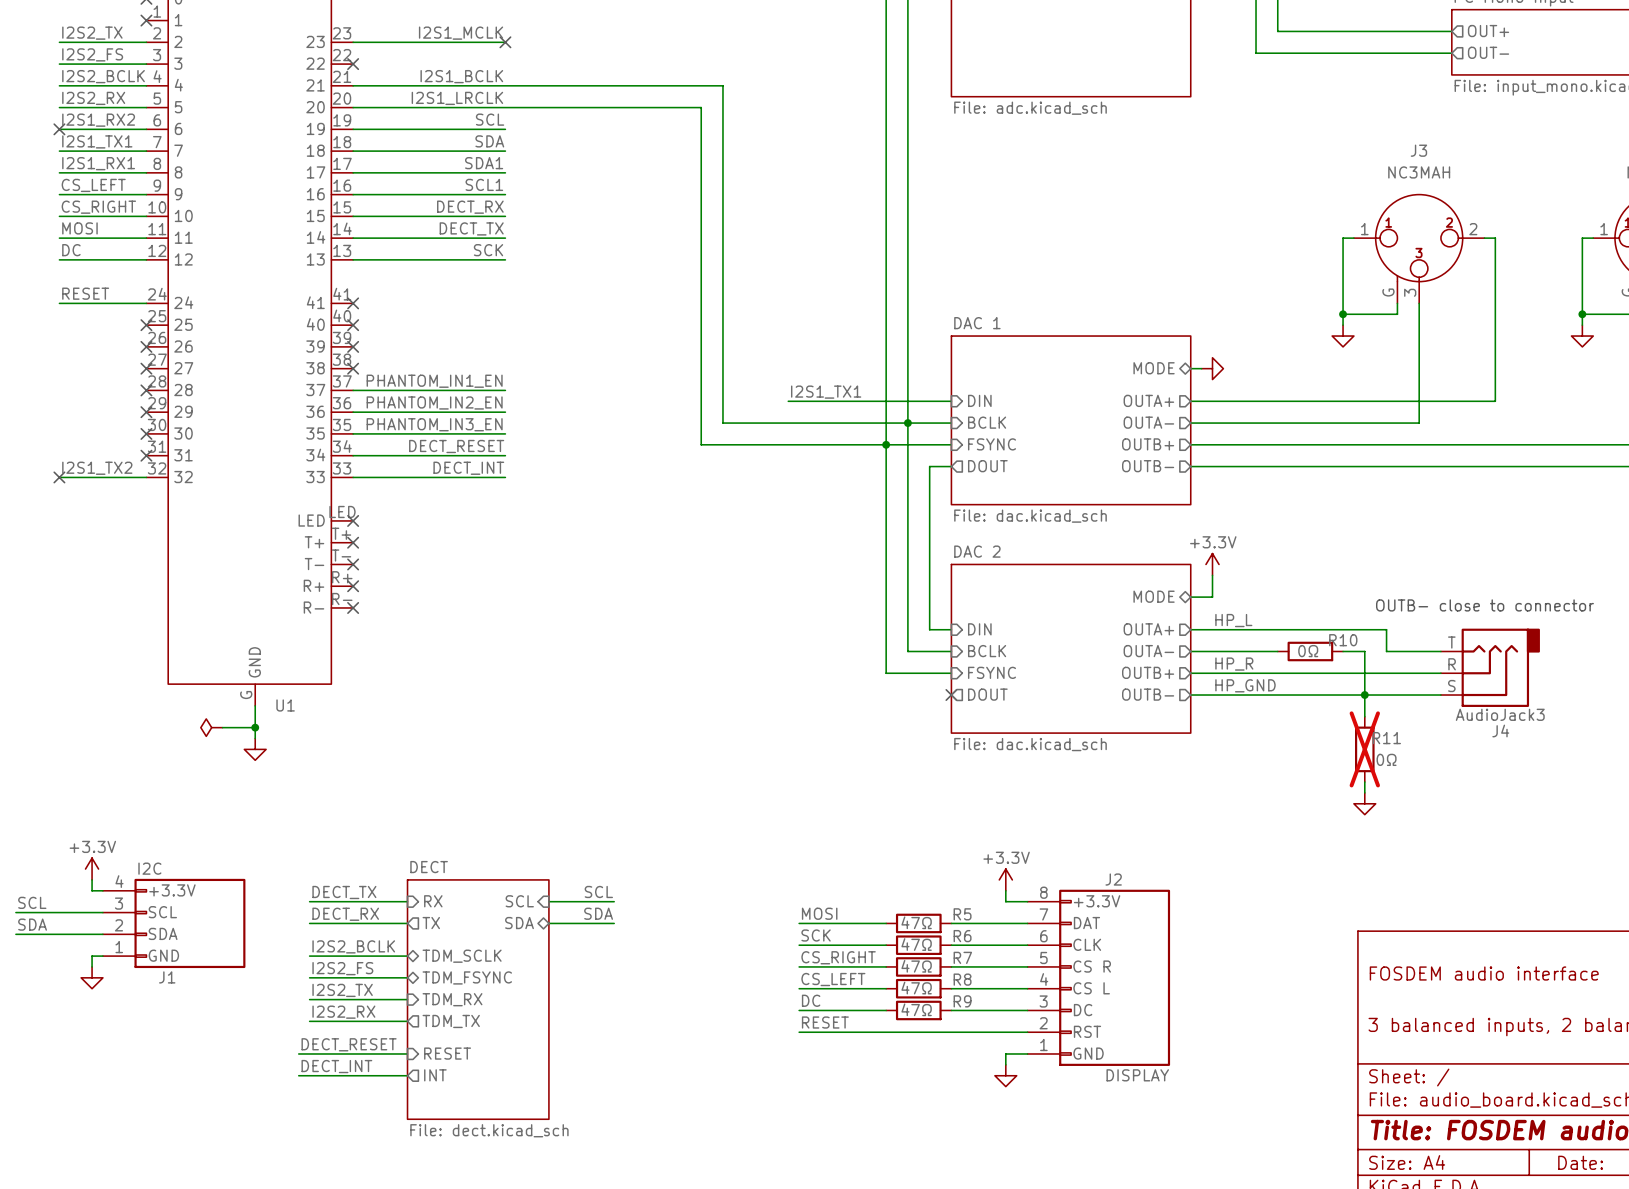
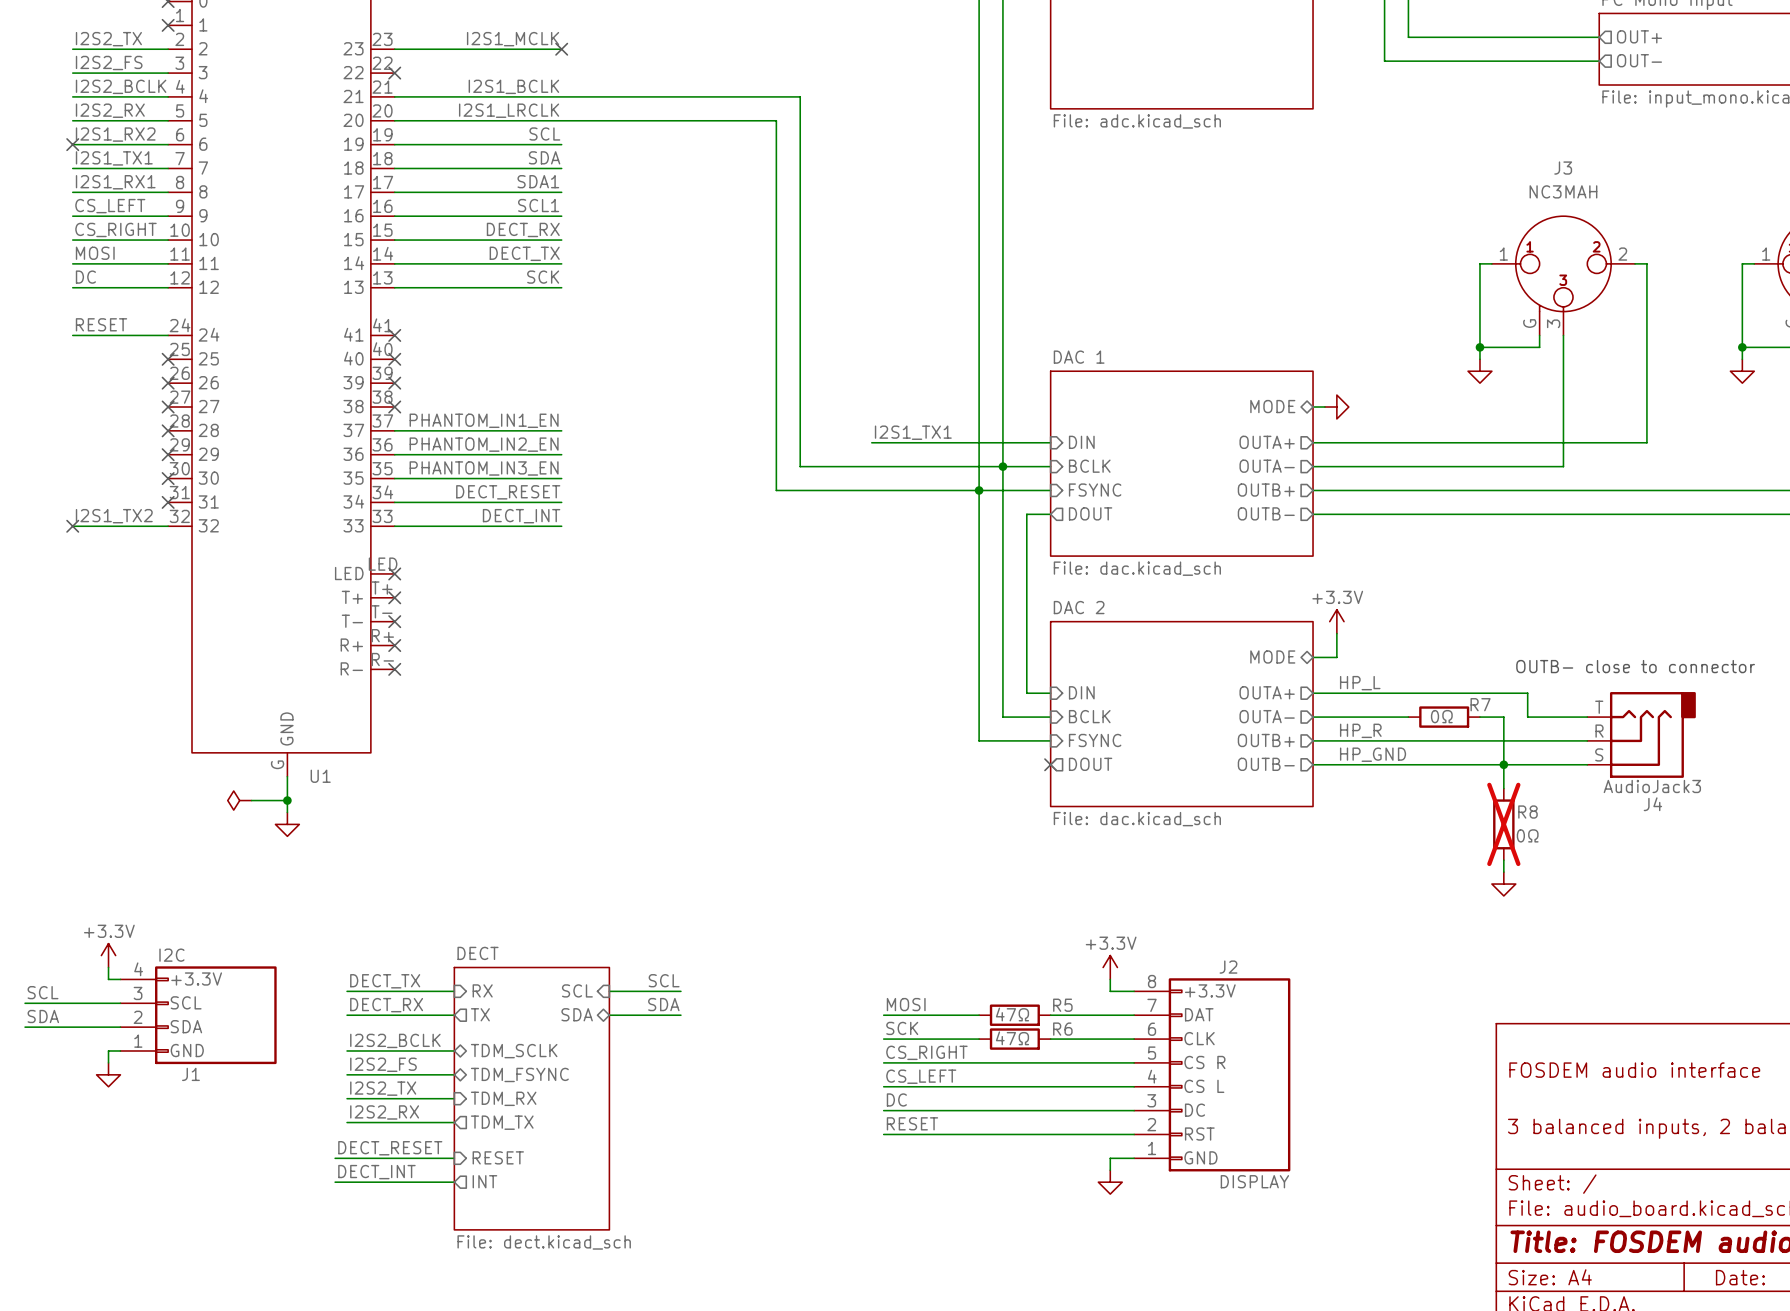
R10 name: R10 (1343, 640) -> R7 (1480, 704)
R11 name: R11 (1386, 738) -> R8 (1527, 812)
wire: none -> (979, 1062) (1050, 1062)
R7: 47Ω (918, 966) -> none
wire: none -> (979, 1086) (1050, 1086)
R8: 47Ω (918, 988) -> none
wire: none -> (979, 1110) (1050, 1110)
R9: 47Ω (918, 1010) -> none

